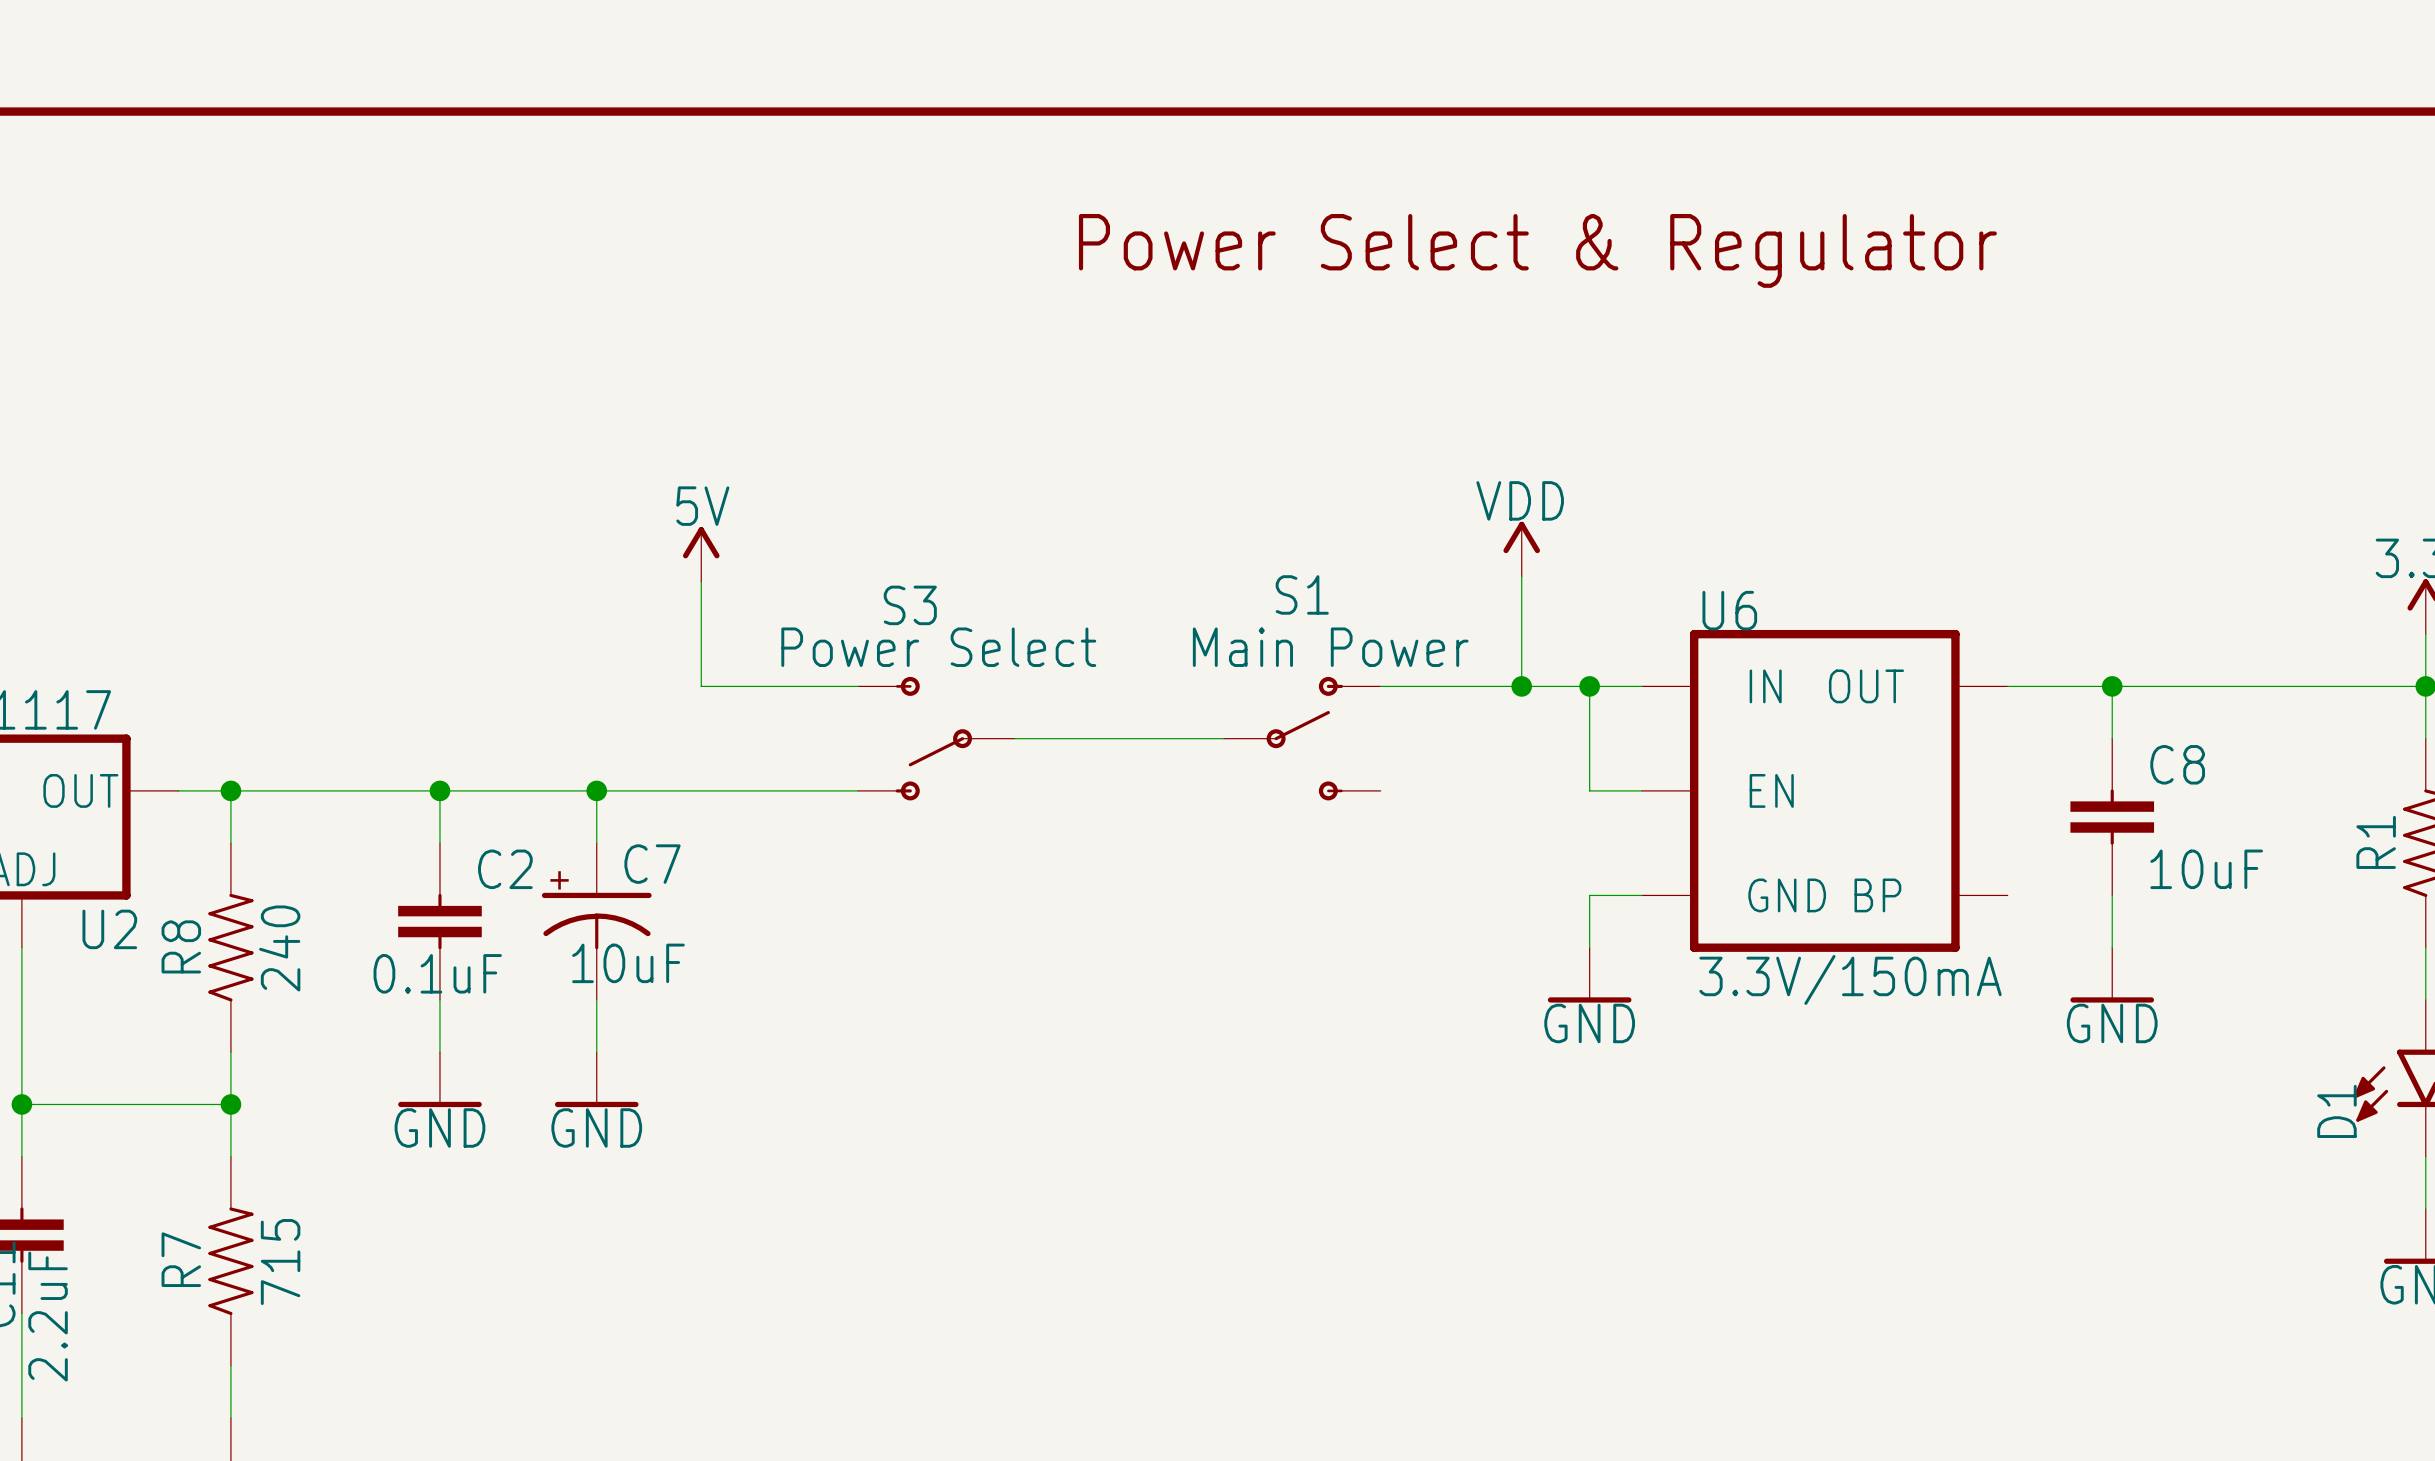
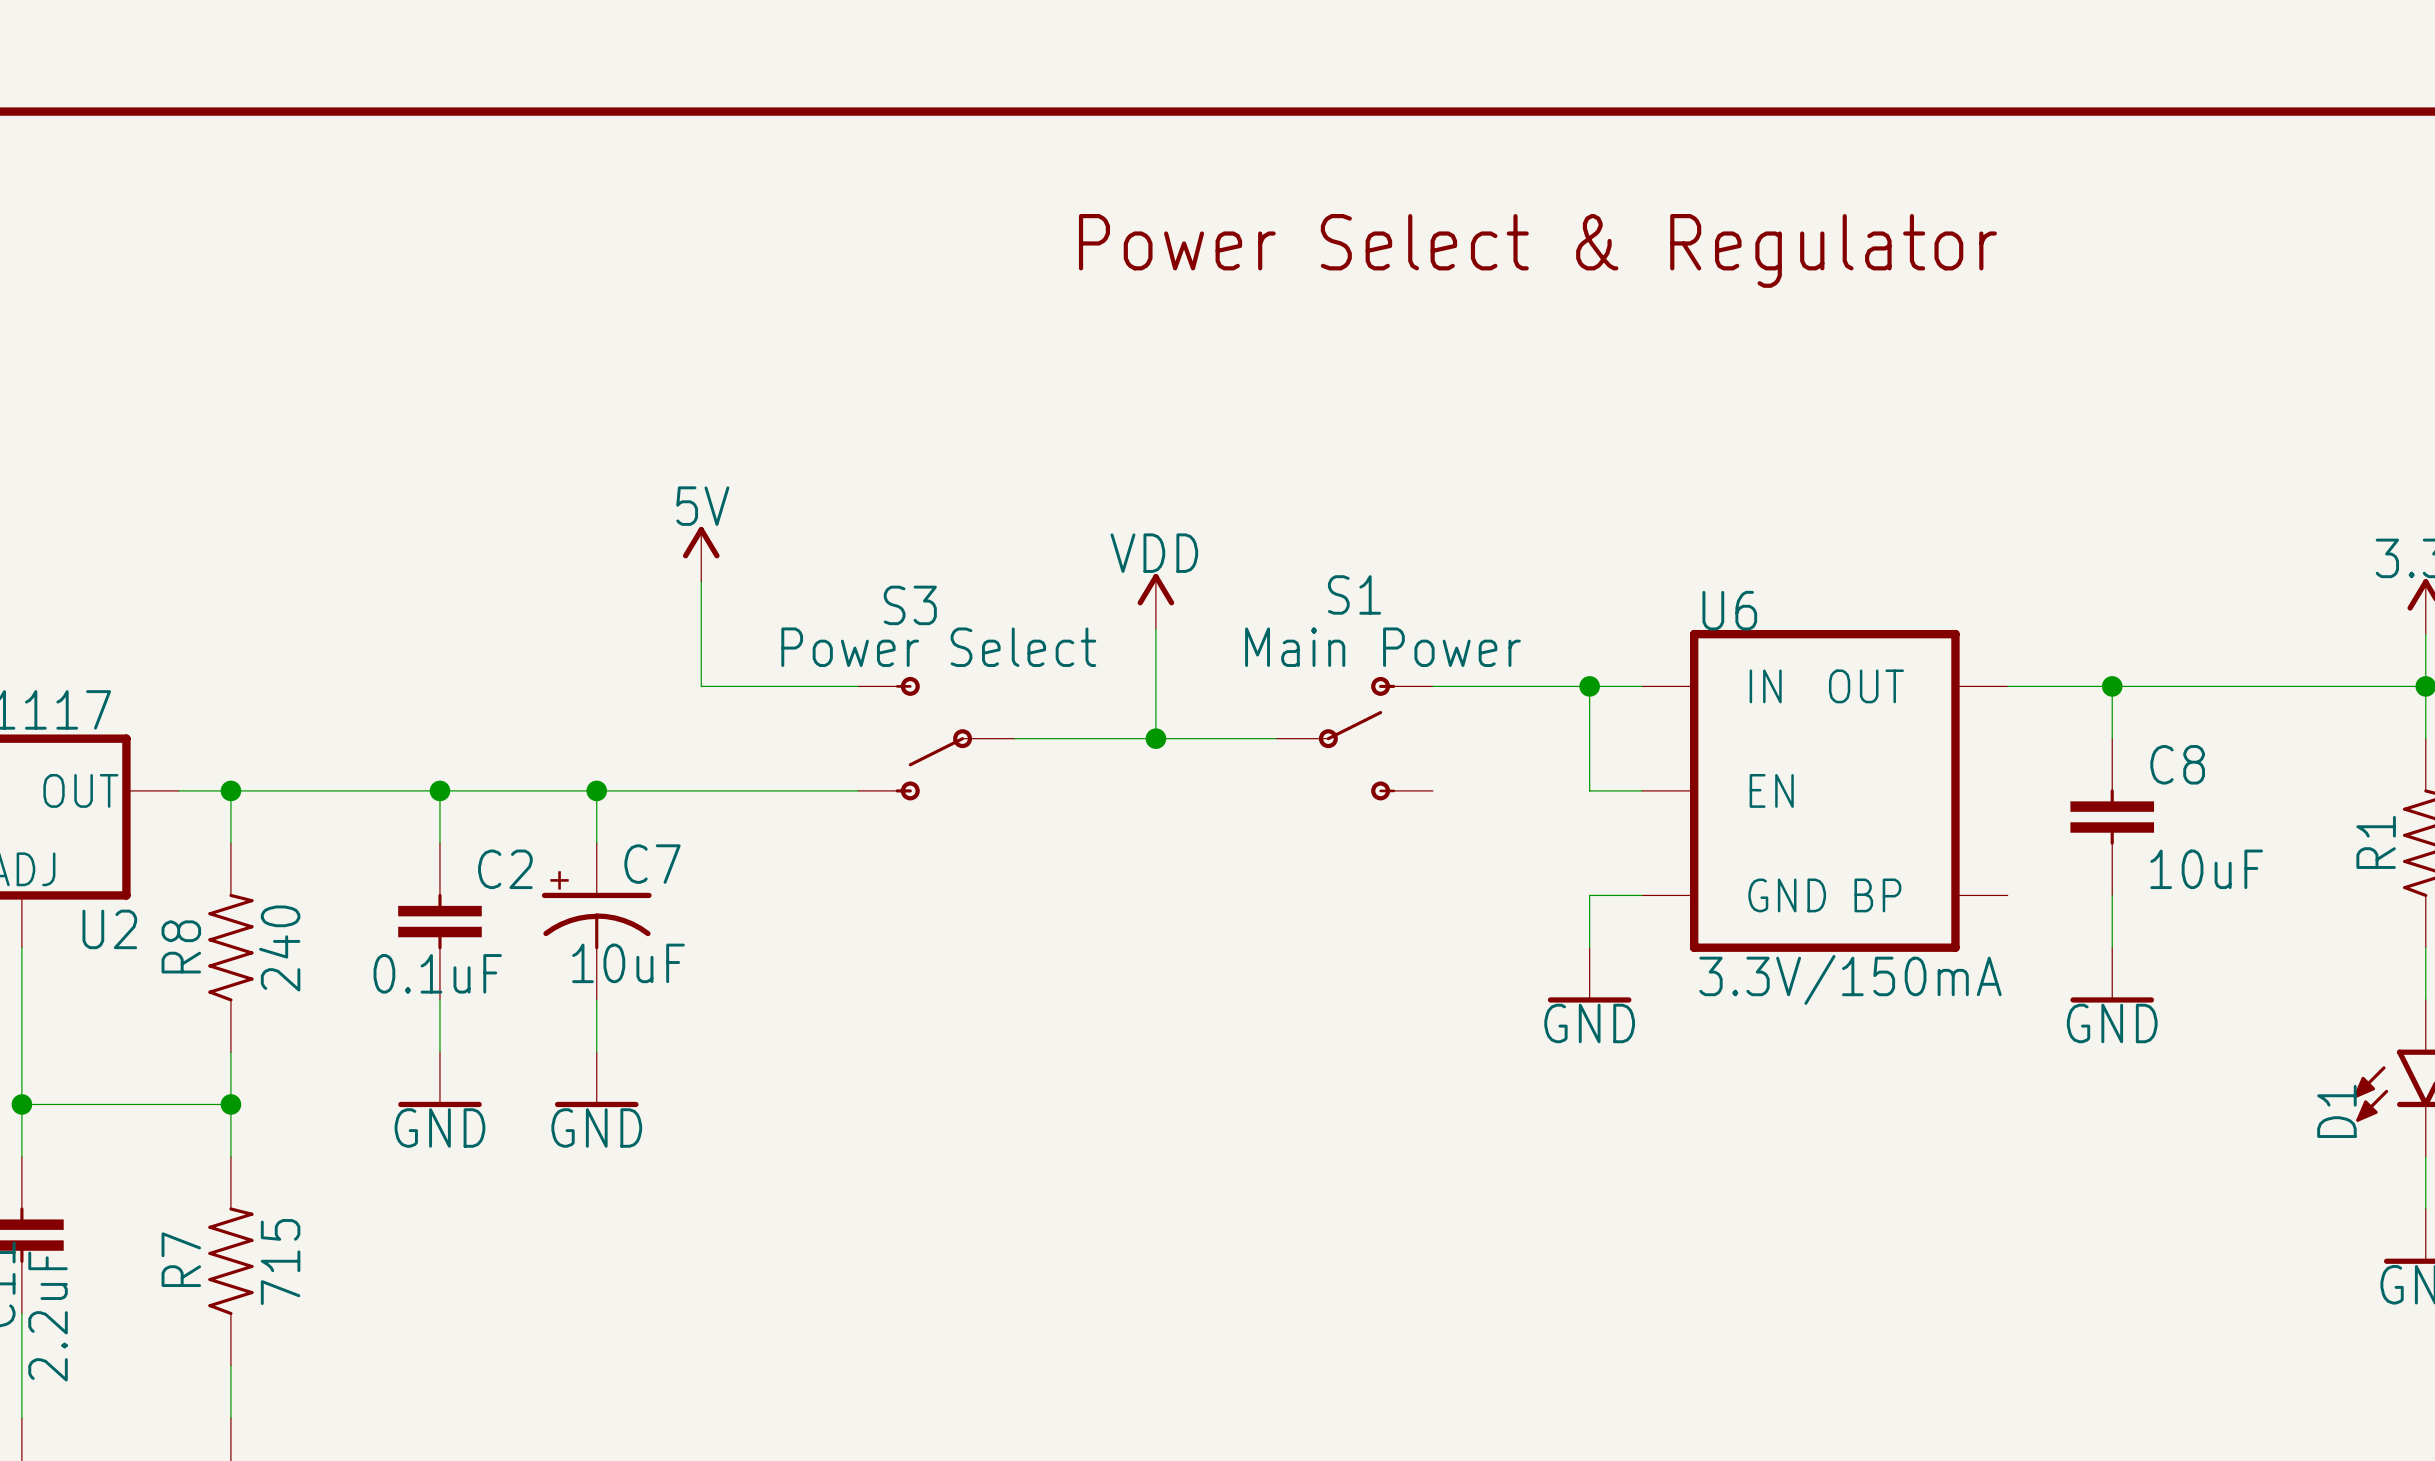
power symbol position: VDD (1521, 549) -> VDD (1155, 601)
wire: (1521, 576) (1521, 686) -> (1155, 628) (1155, 738)
junction: (1521, 686) -> none
junction: none -> (1155, 738)
S1 position: (1302, 738) -> (1354, 738)

